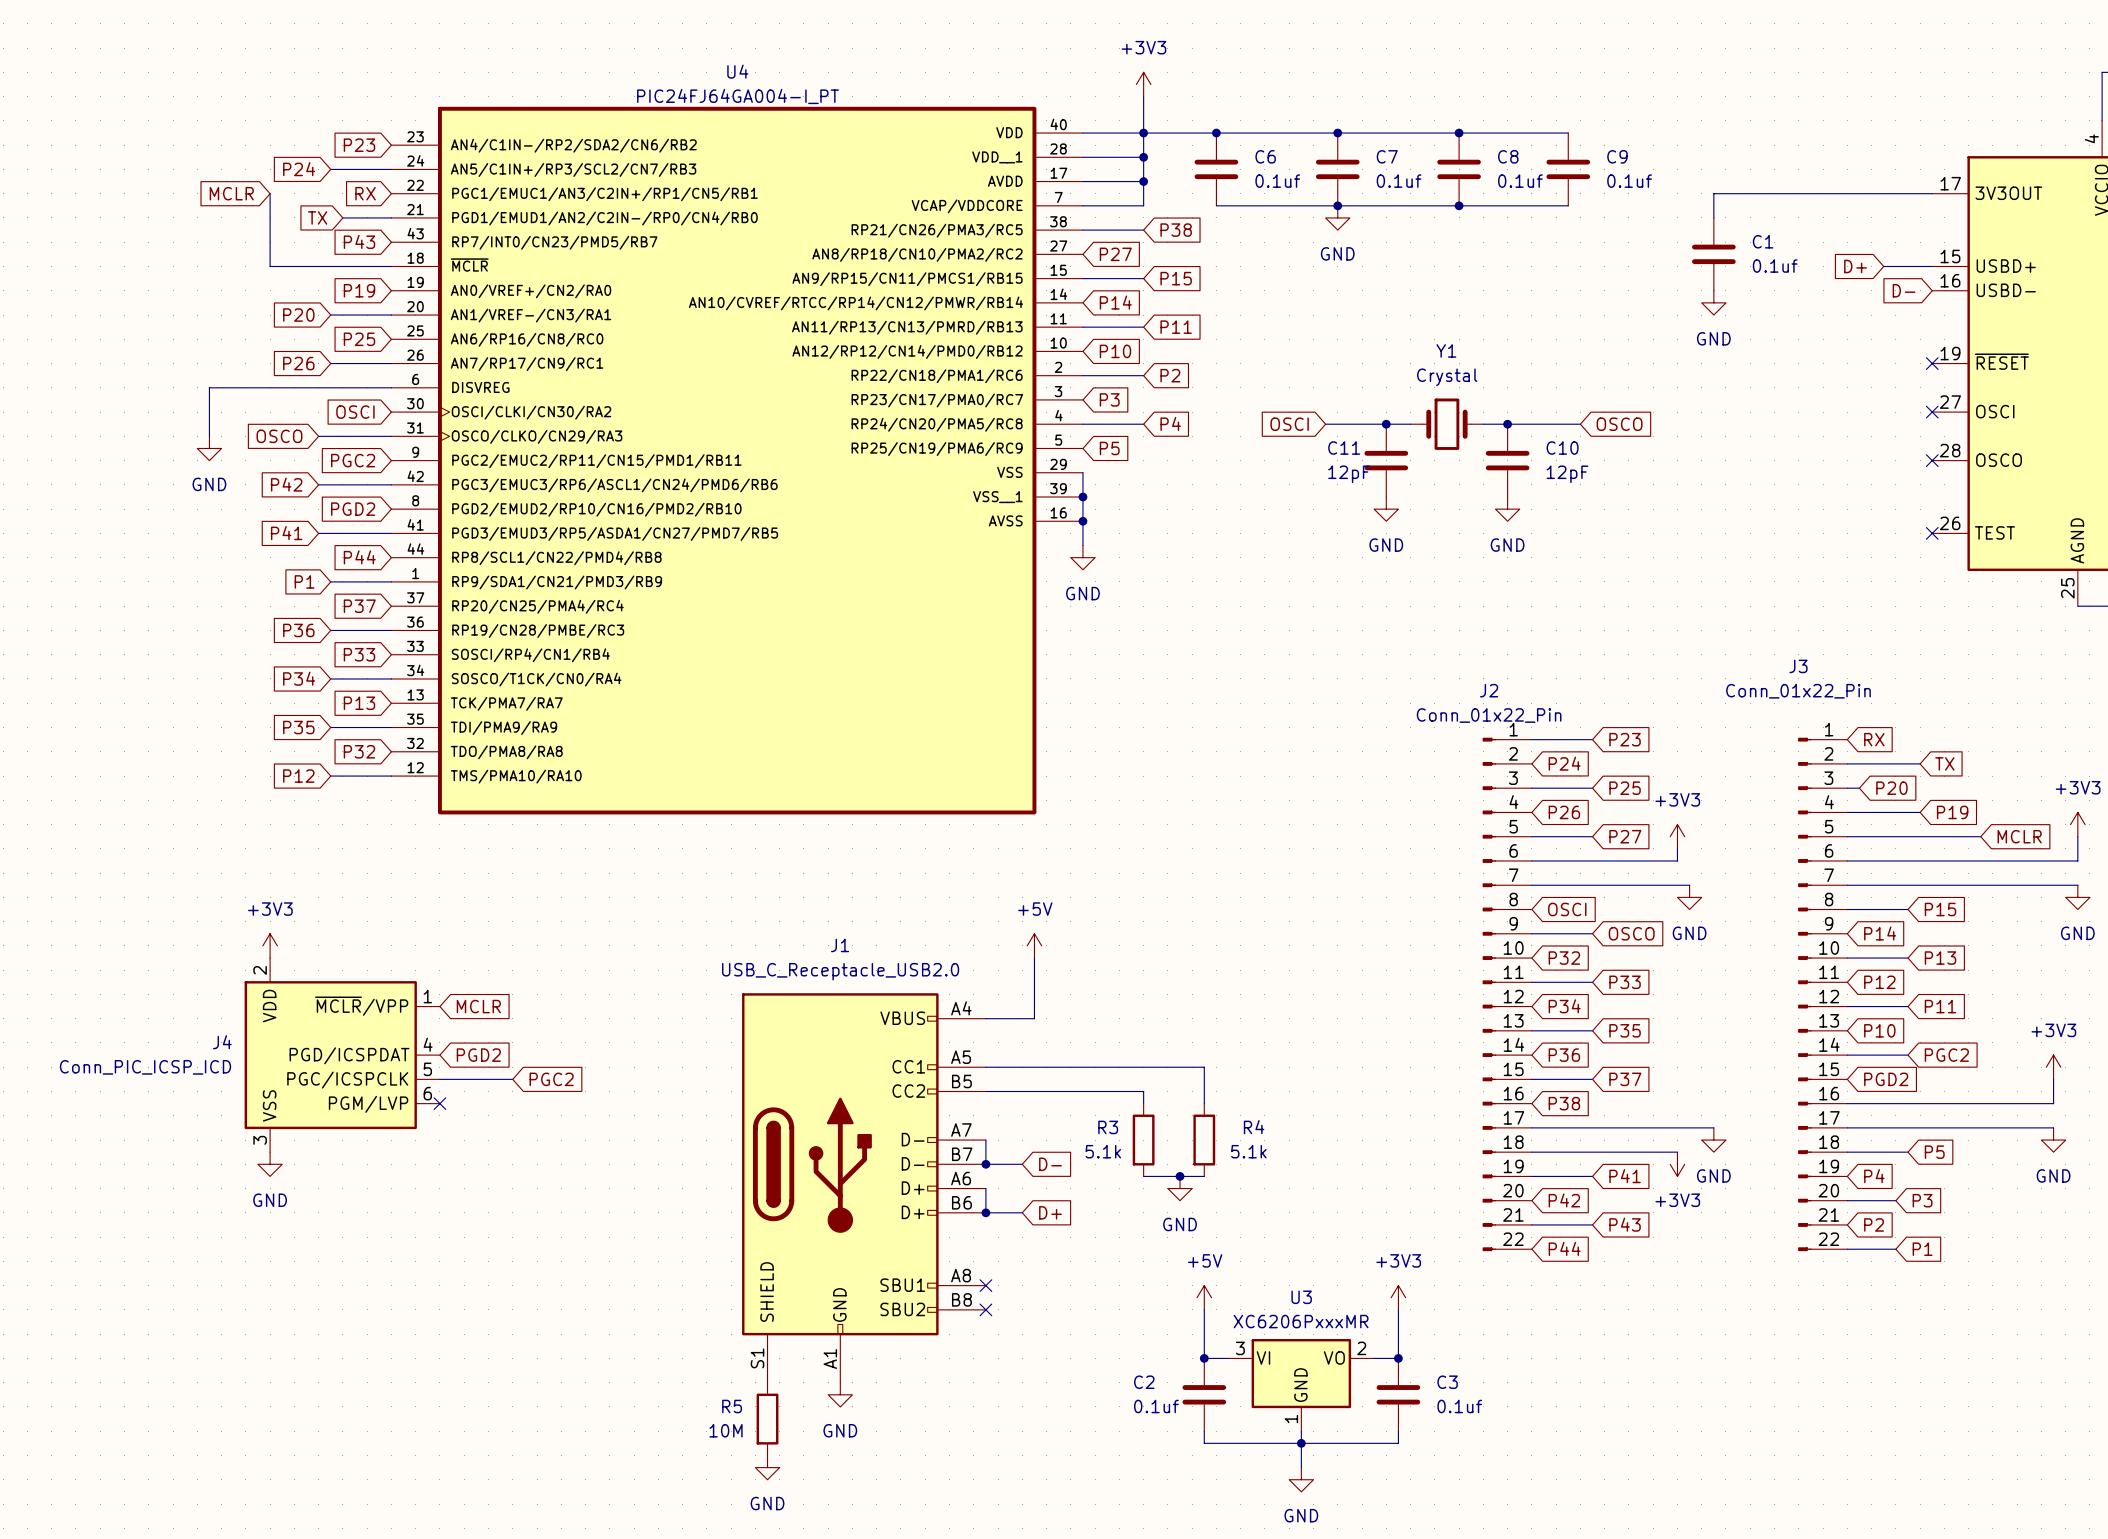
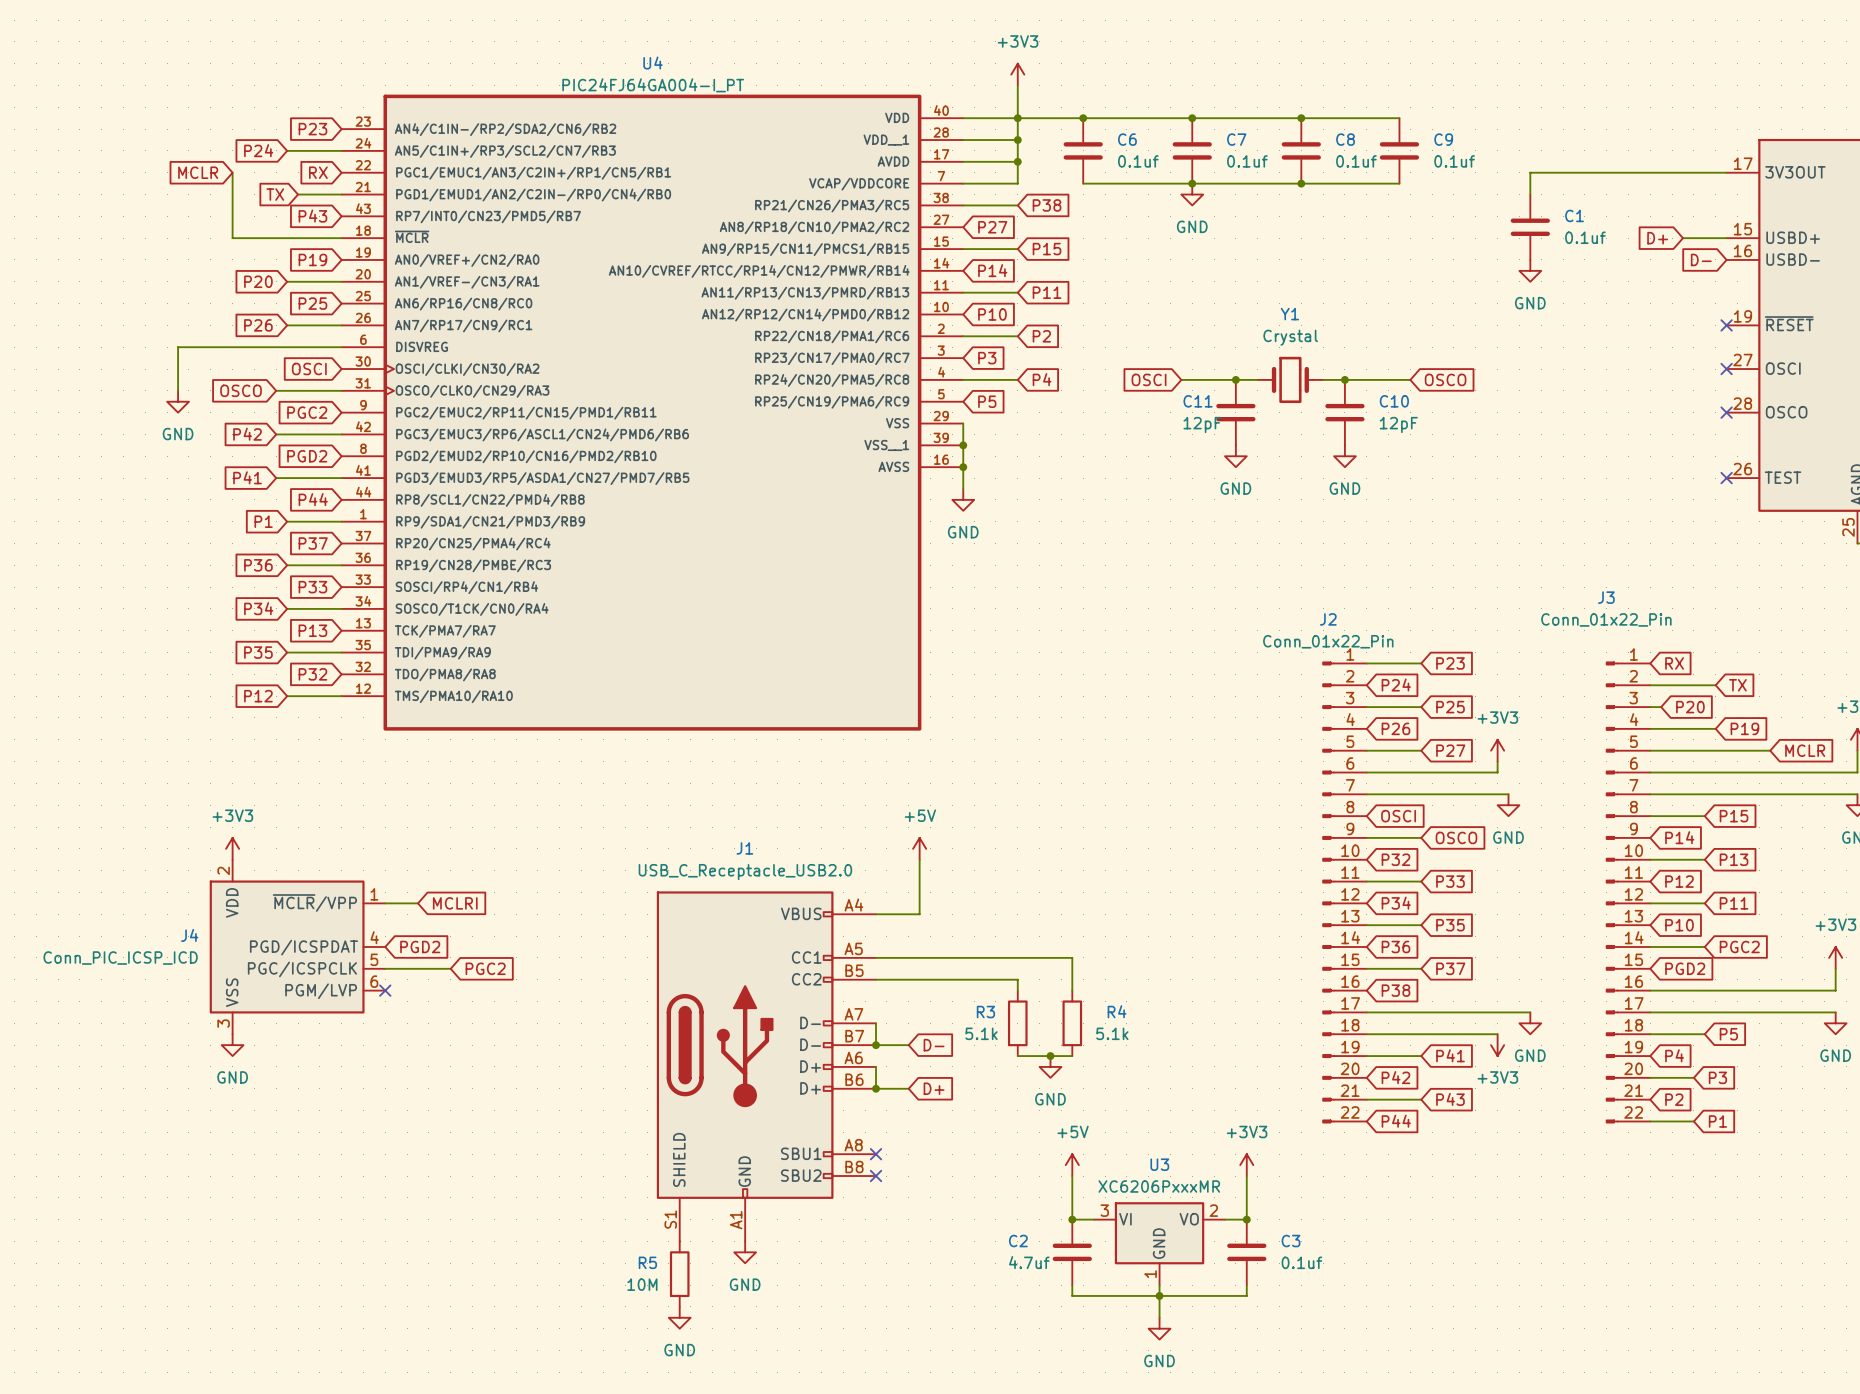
wire: none -> (385, 903) (417, 903)
global label: MCLR (478, 1006) -> MCLRI (455, 903)
C2 value: 0.1uf (1156, 1406) -> 4.7uf (1029, 1262)

